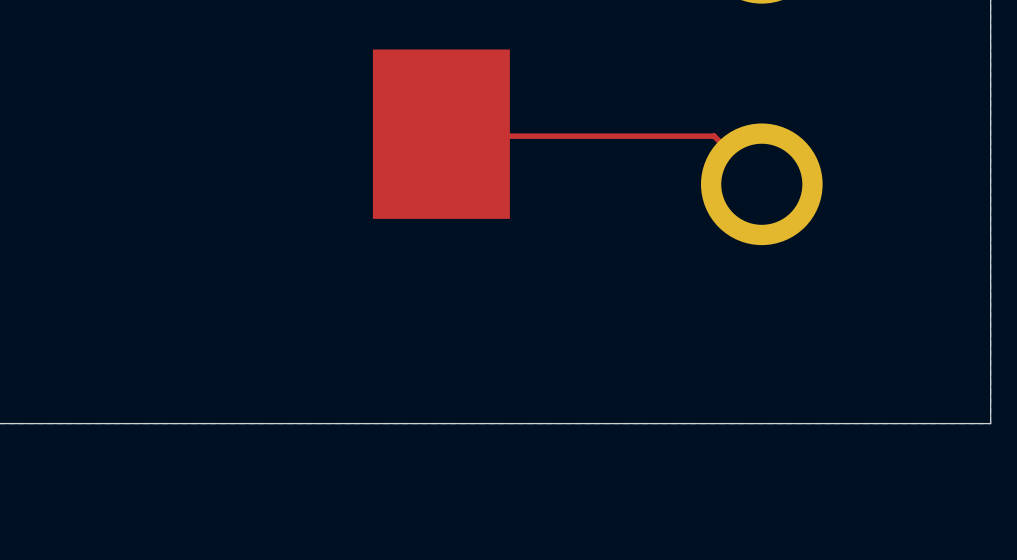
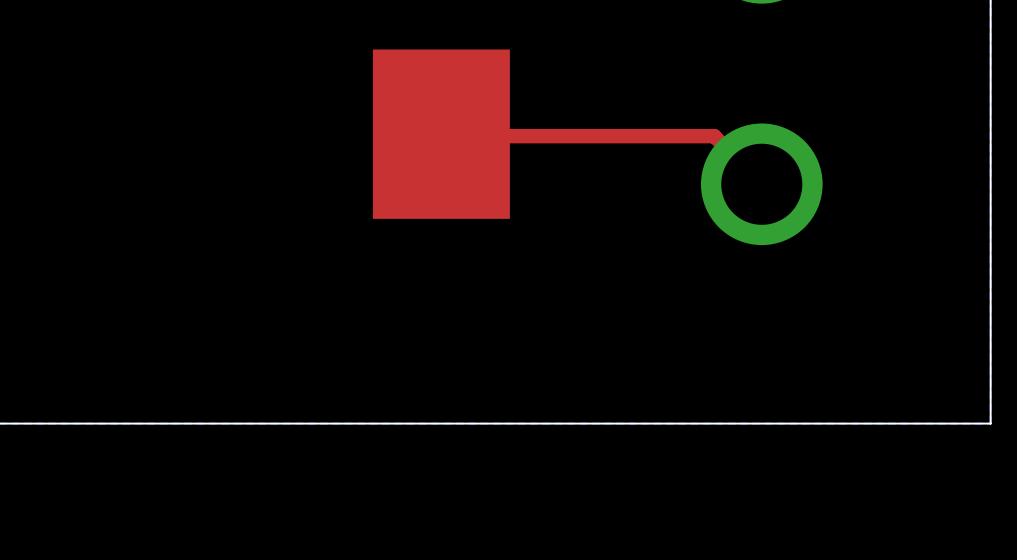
top track width: thin (441, 134) (445, 136) (714, 136) (761, 184) -> thick (441, 134) (445, 136) (714, 136) (761, 184)

